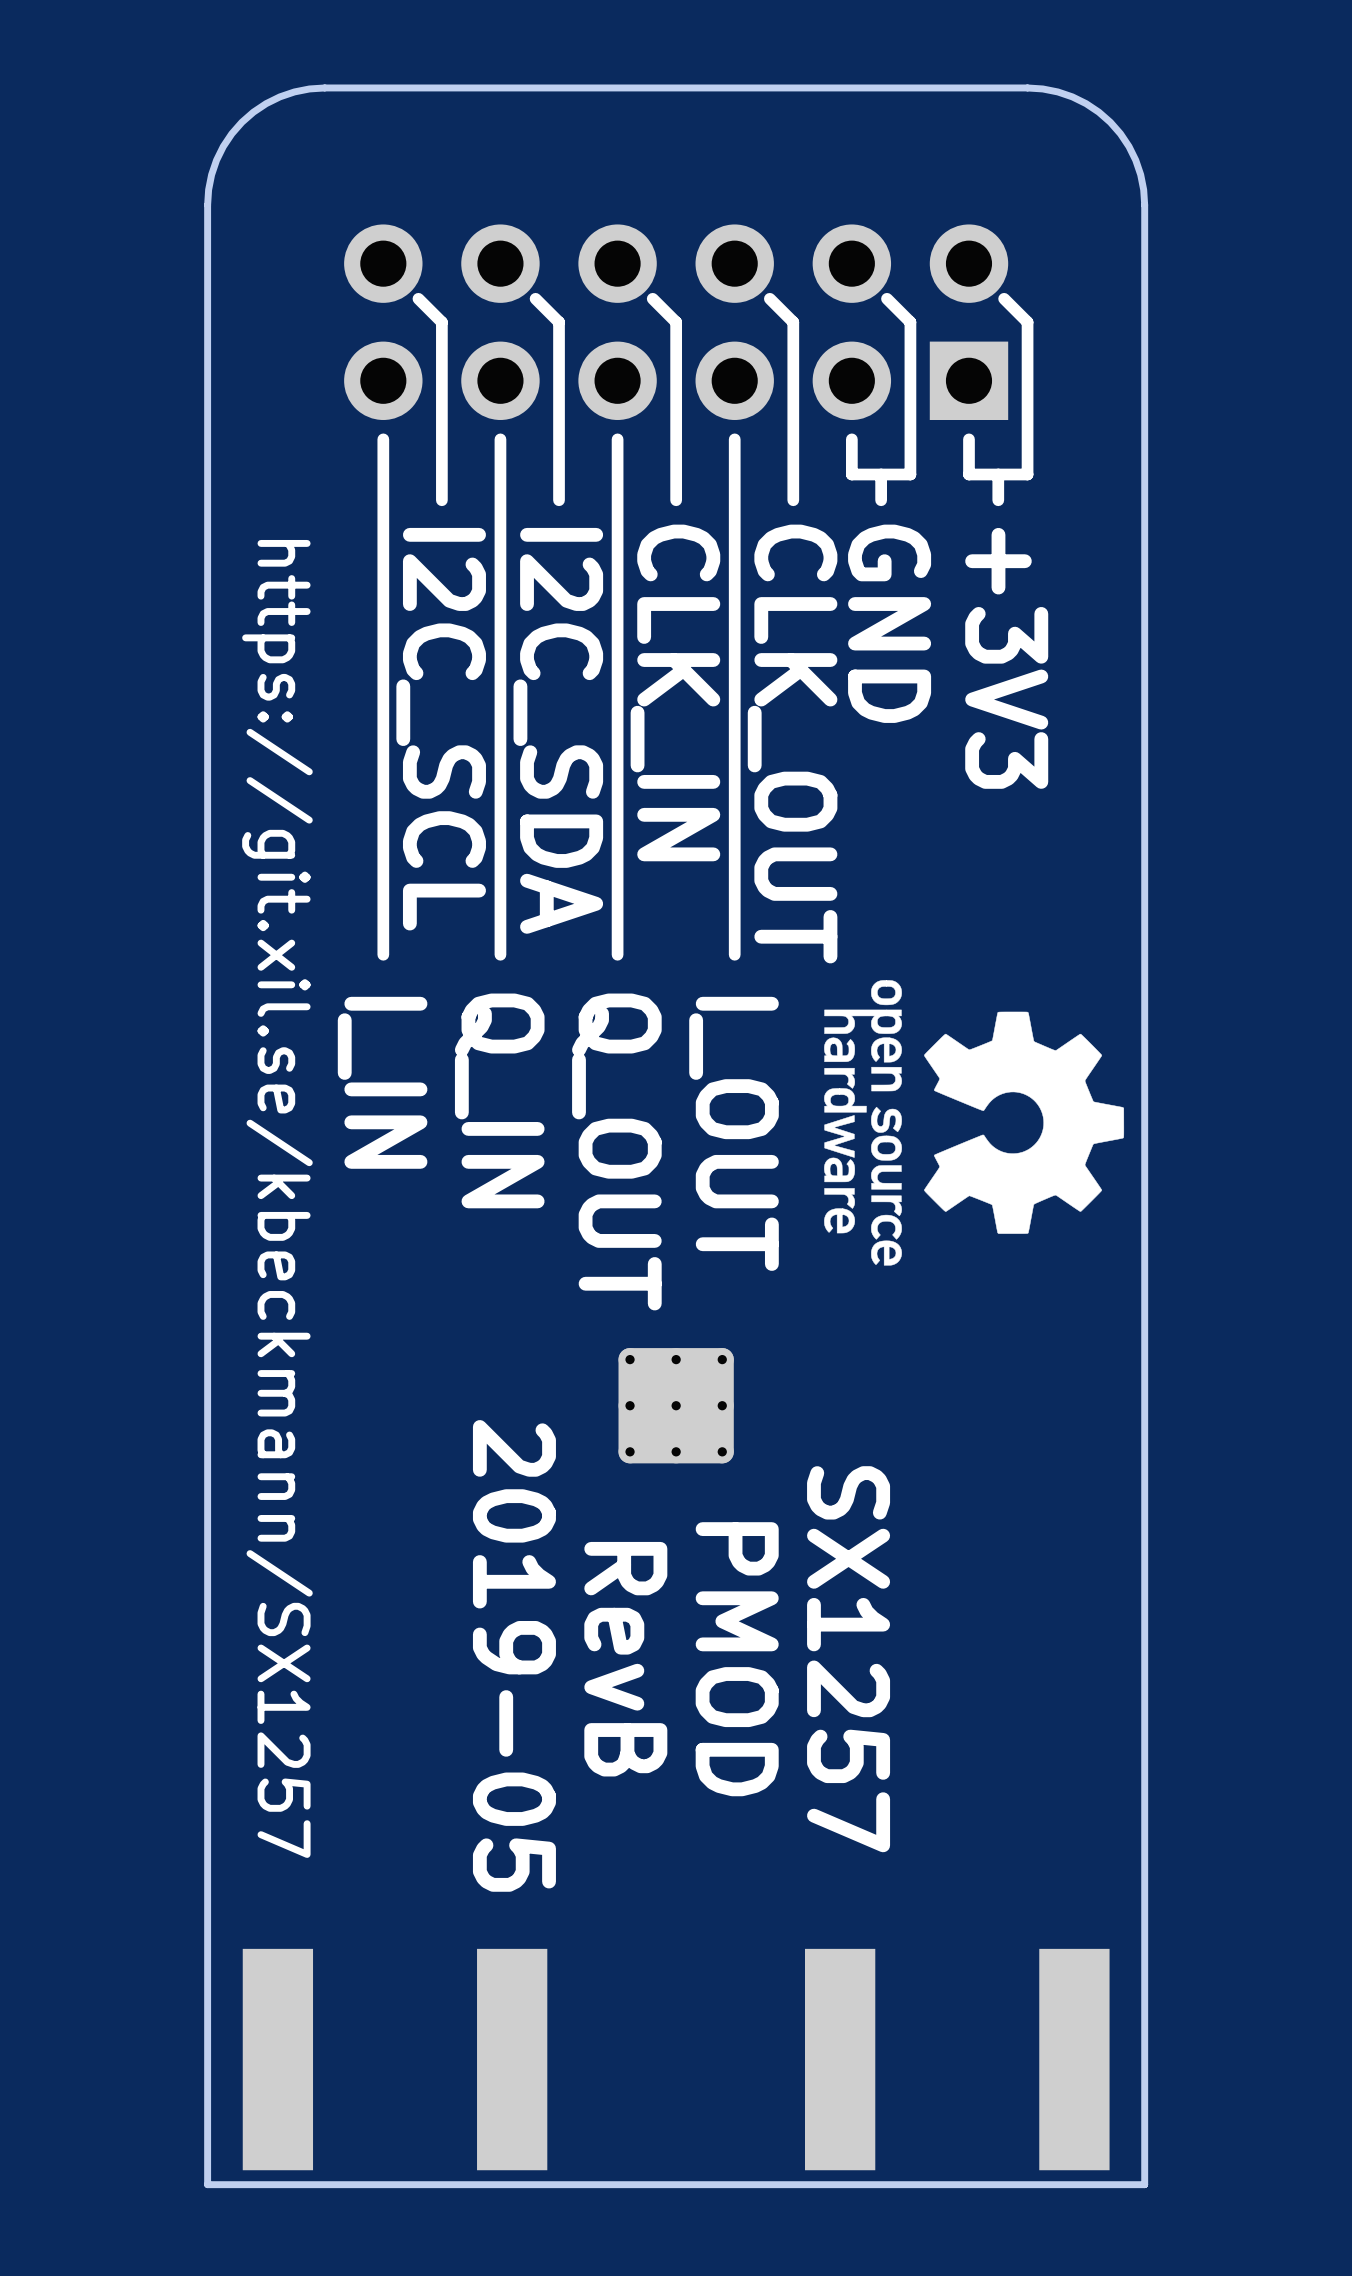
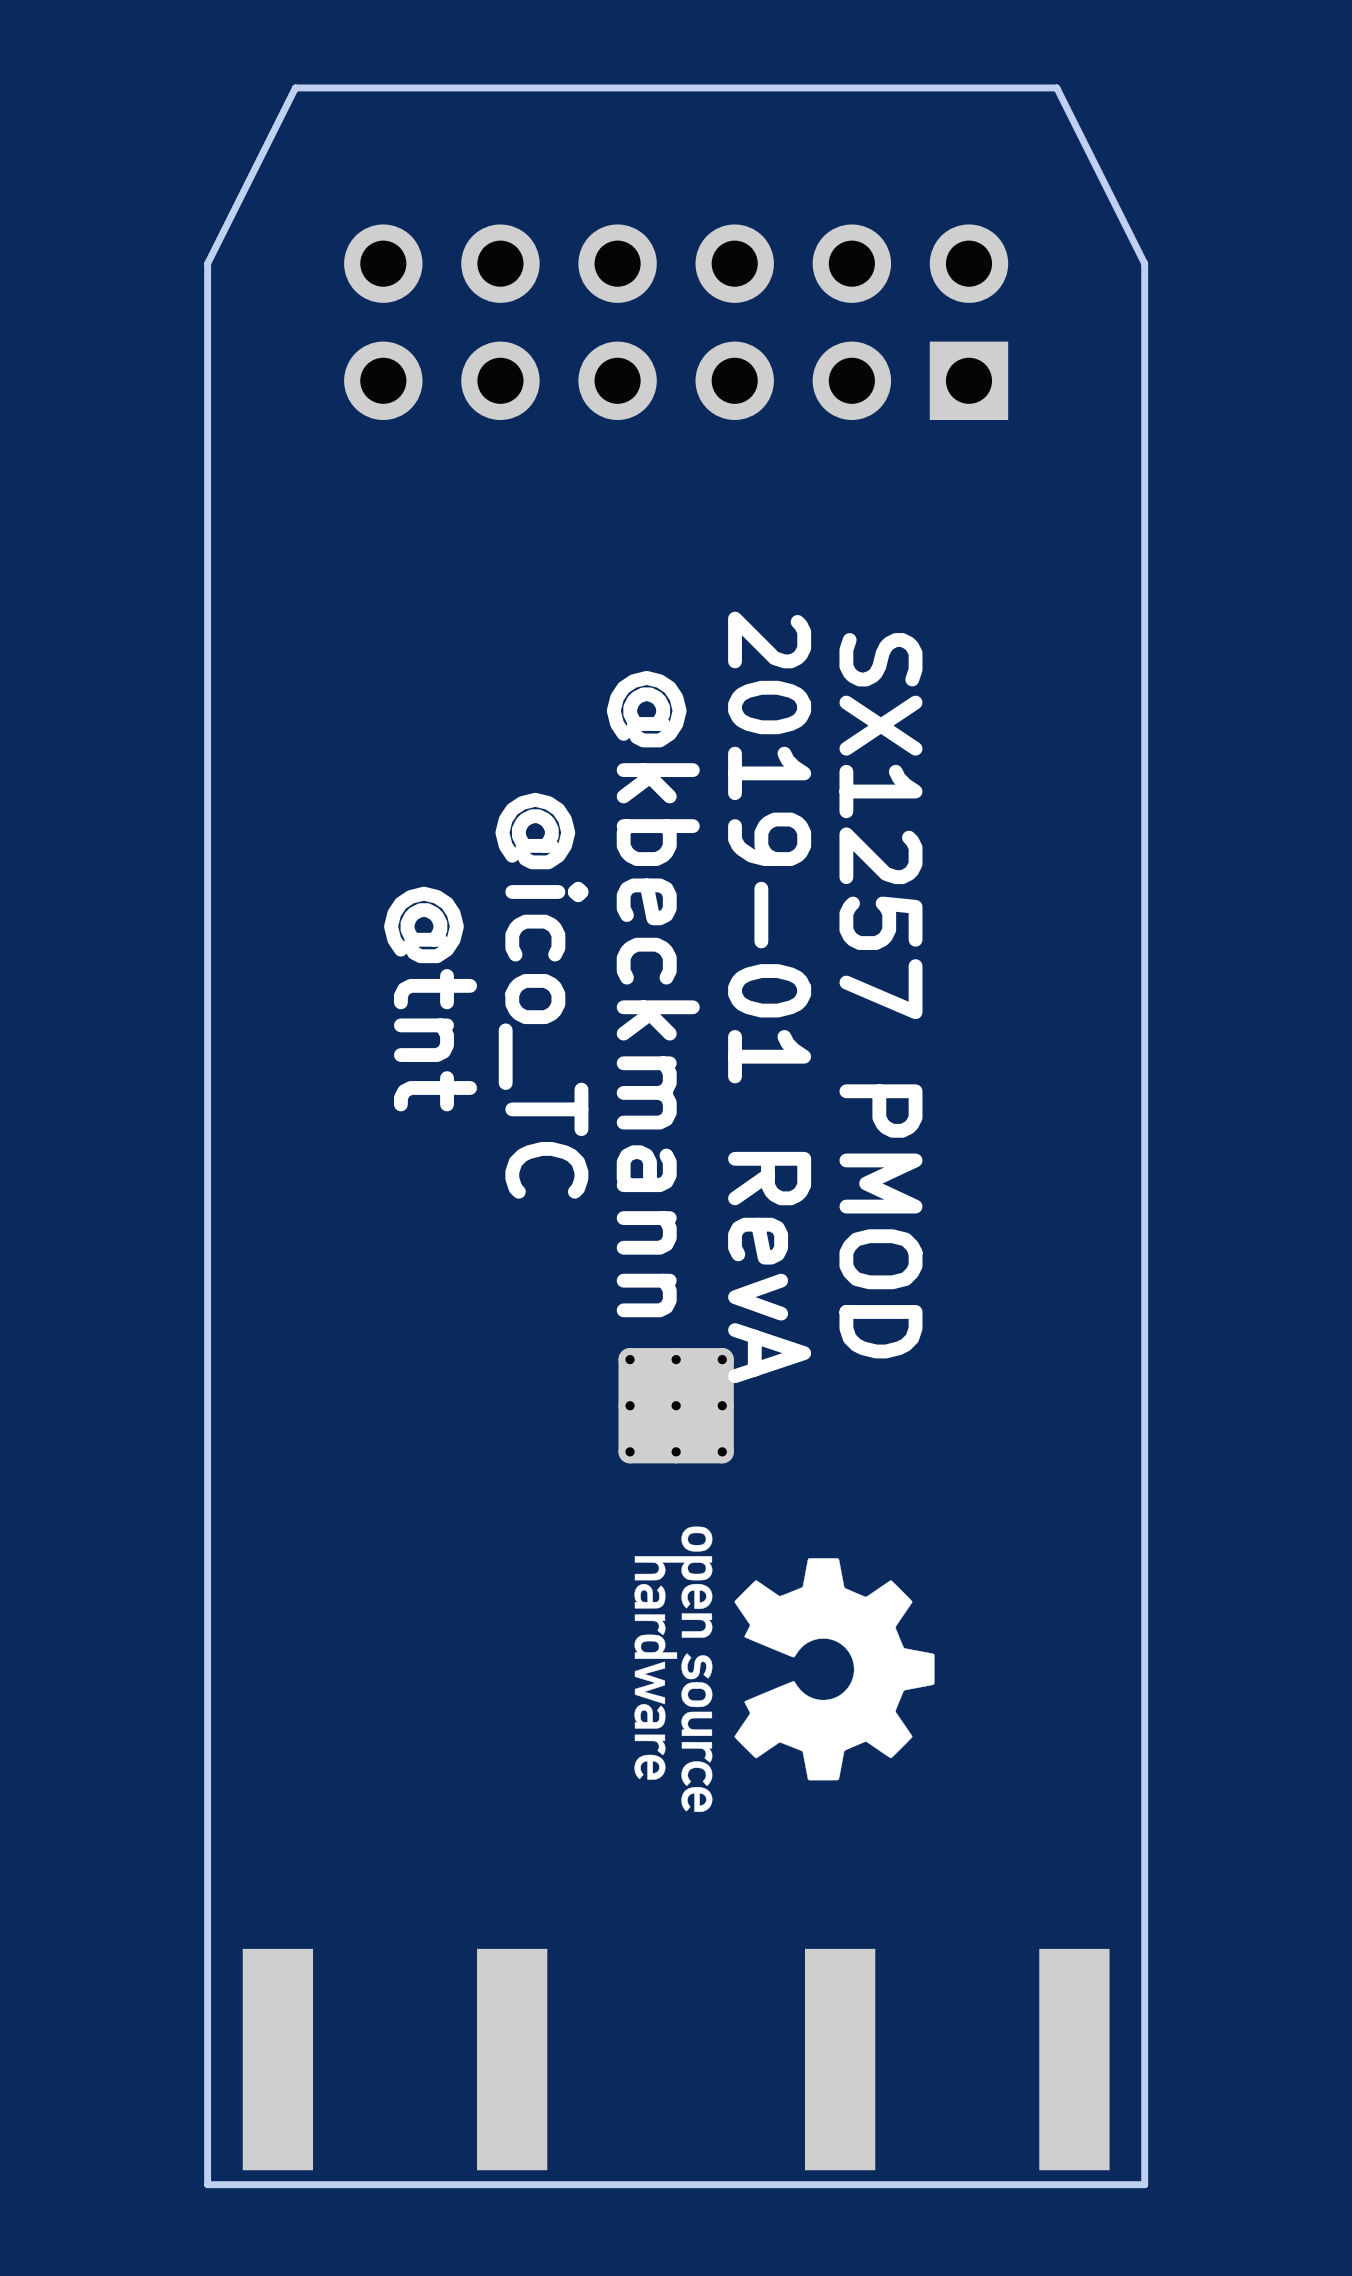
board edge: (324, 87) (294, 91) (266, 103) (241, 122) (223, 146) (211, 174) (208, 189) (207, 263) -> (324, 87) (295, 87) (207, 263)
board edge: (1027, 87) (1057, 91) (1086, 103) (1110, 122) (1129, 146) (1140, 174) (1143, 189) (1144, 263) -> (1027, 87) (1056, 87) (1144, 263)
line: (418, 298) (441, 322) (441, 500) -> none
line: (535, 298) (559, 322) (559, 500) -> none
line: (652, 298) (676, 322) (676, 500) -> none
line: (769, 298) (793, 322) (793, 500) -> none
line: (886, 298) (910, 322) (910, 474) (851, 474) (851, 439) -> none
line: (1004, 298) (1027, 322) (1027, 474) (968, 474) (968, 439) -> none
line: (383, 439) (383, 954) -> none
line: (500, 439) (500, 954) -> none
line: (617, 439) (617, 954) -> none
line: (734, 439) (734, 954) -> none
line: (881, 474) (881, 500) -> none
line: (998, 474) (998, 500) -> none
text: GND (889, 623) -> none
text: +3V3 (1006, 658) -> none
text: CLK_IN (675, 692) -> none
text: I2C_SCL (441, 729) -> none
text: I2C_SDA (558, 730) -> none
text: CLK_OUT (792, 744) -> none
text: none -> @kbeckmann (653, 994)
text: none -> @ico_TC (541, 995)
text: none -> SX1257 PMOD (880, 995)
text: none -> @tnt (430, 999)
text: I_IN (382, 1082) -> none
text: Q_IN (499, 1100) -> none
drawing position: (974, 1122) -> (784, 1669)
text: I_OUT (734, 1133) -> 2019-01 RevA (769, 997)
text: Q_OUT (616, 1151) -> none
text: https://git.xil.se/kbeckmann/SX1257 (277, 1198) -> none
text: 2019-05 (514, 1655) -> none
text: RevB (625, 1659) -> none
text: PMOD (737, 1659) -> none
text: SX1257 (848, 1659) -> none

